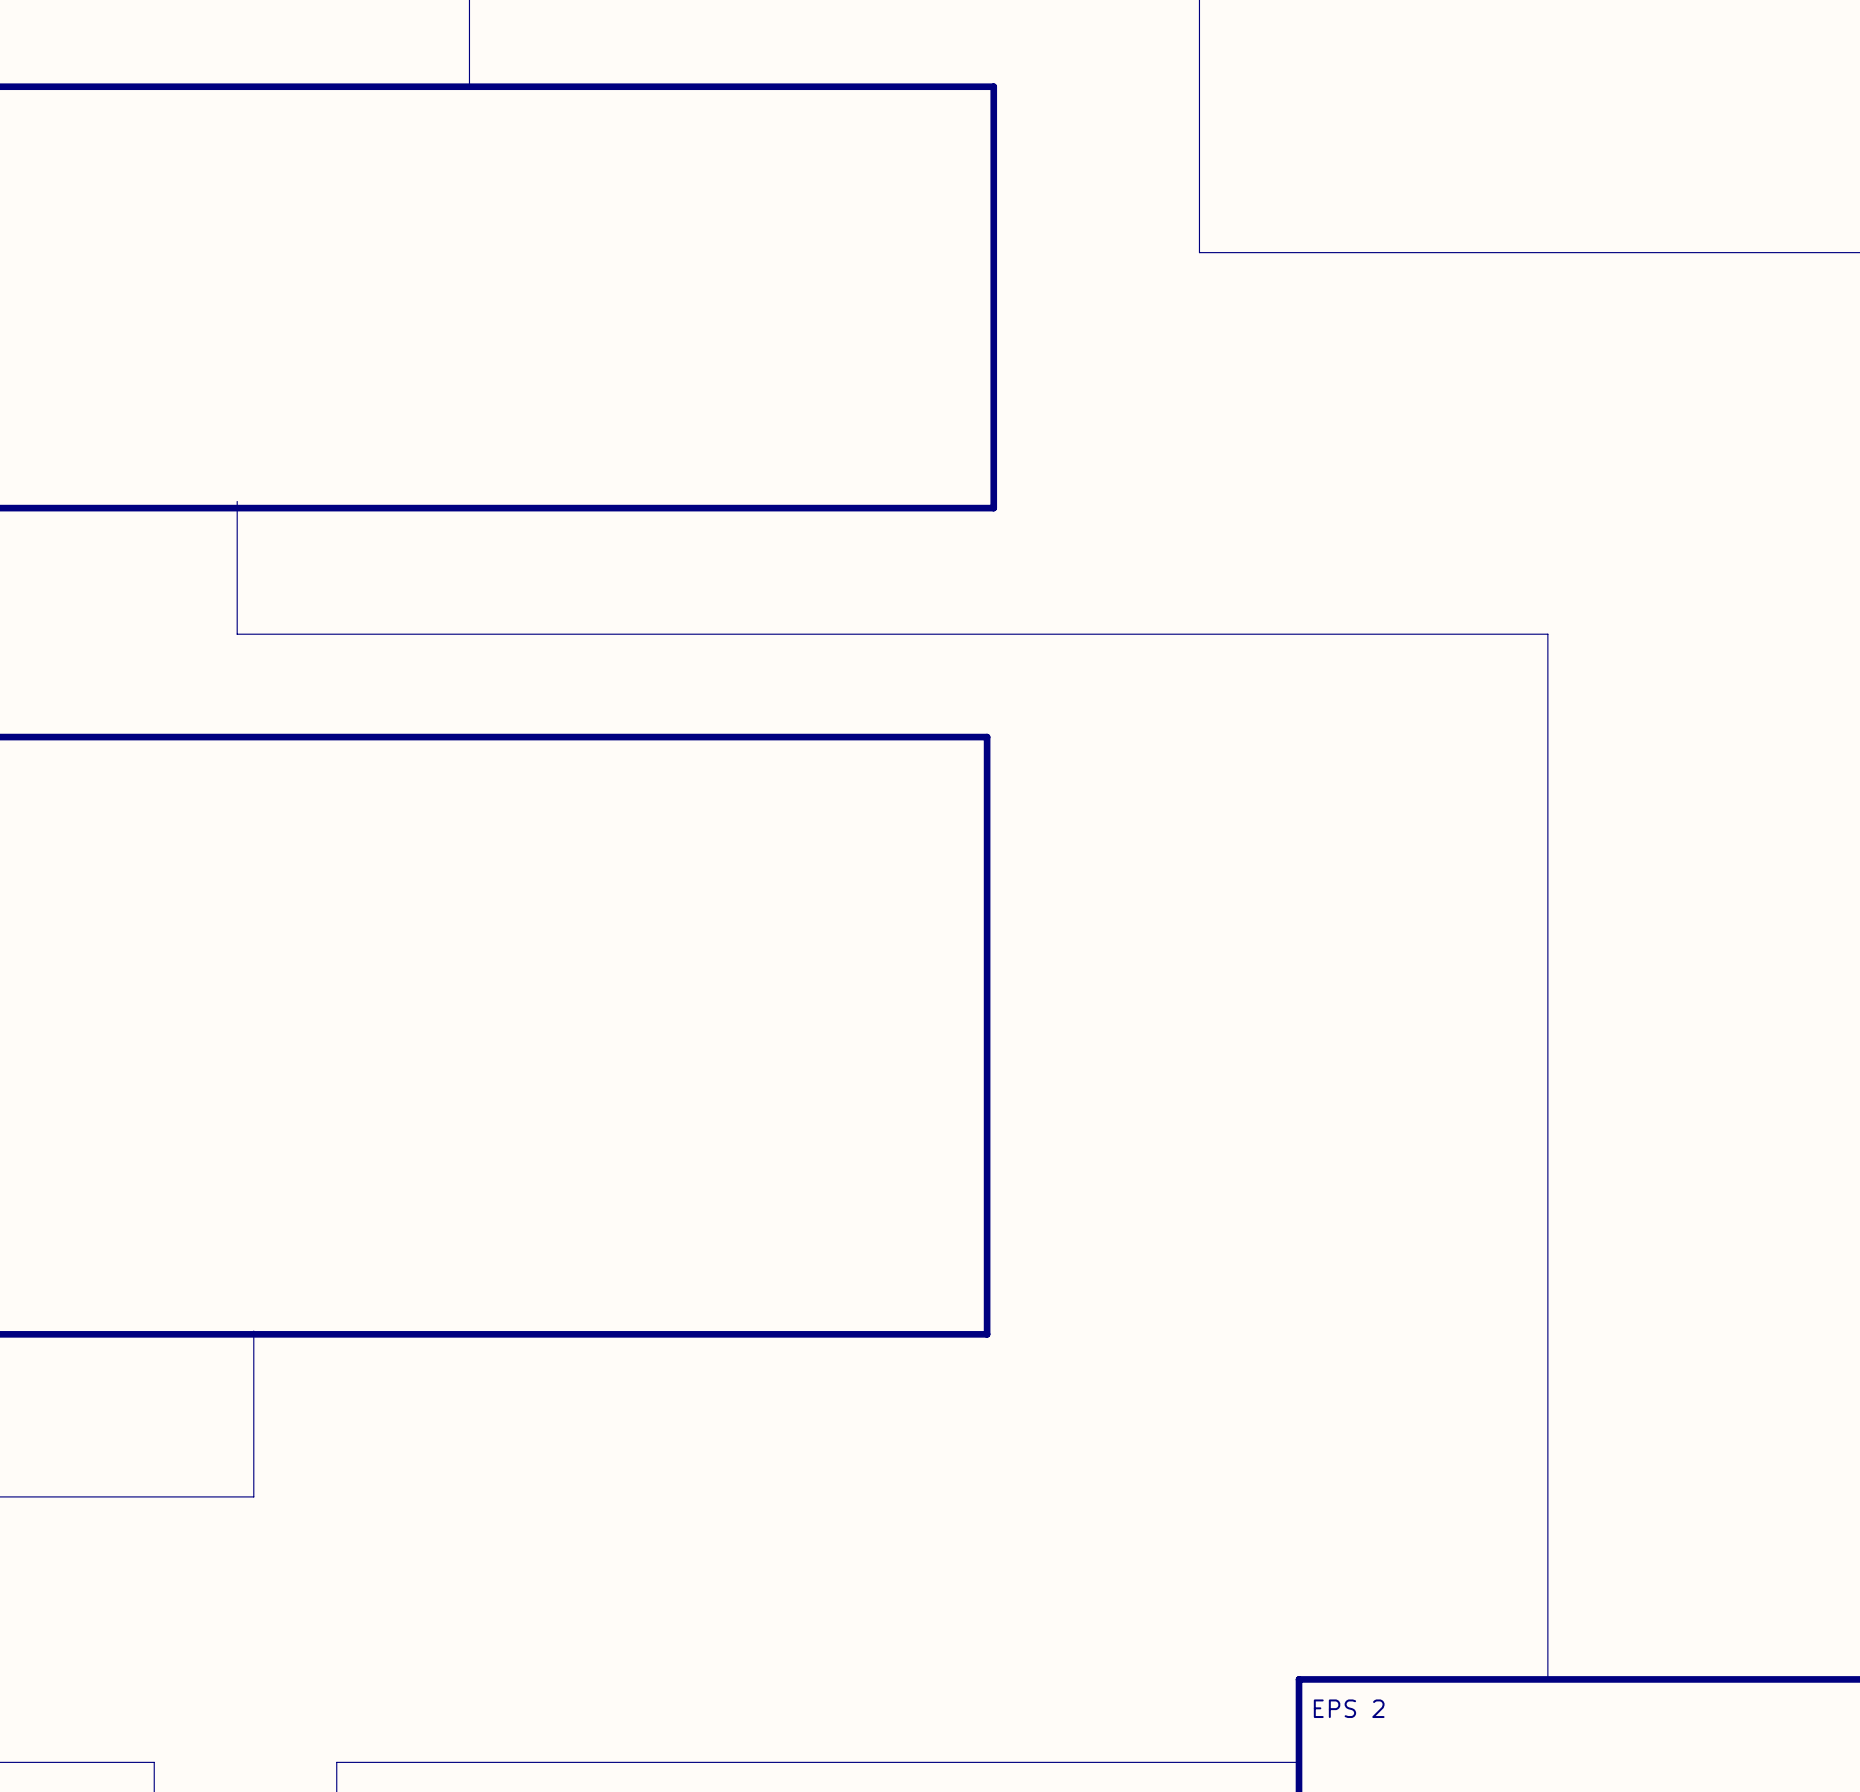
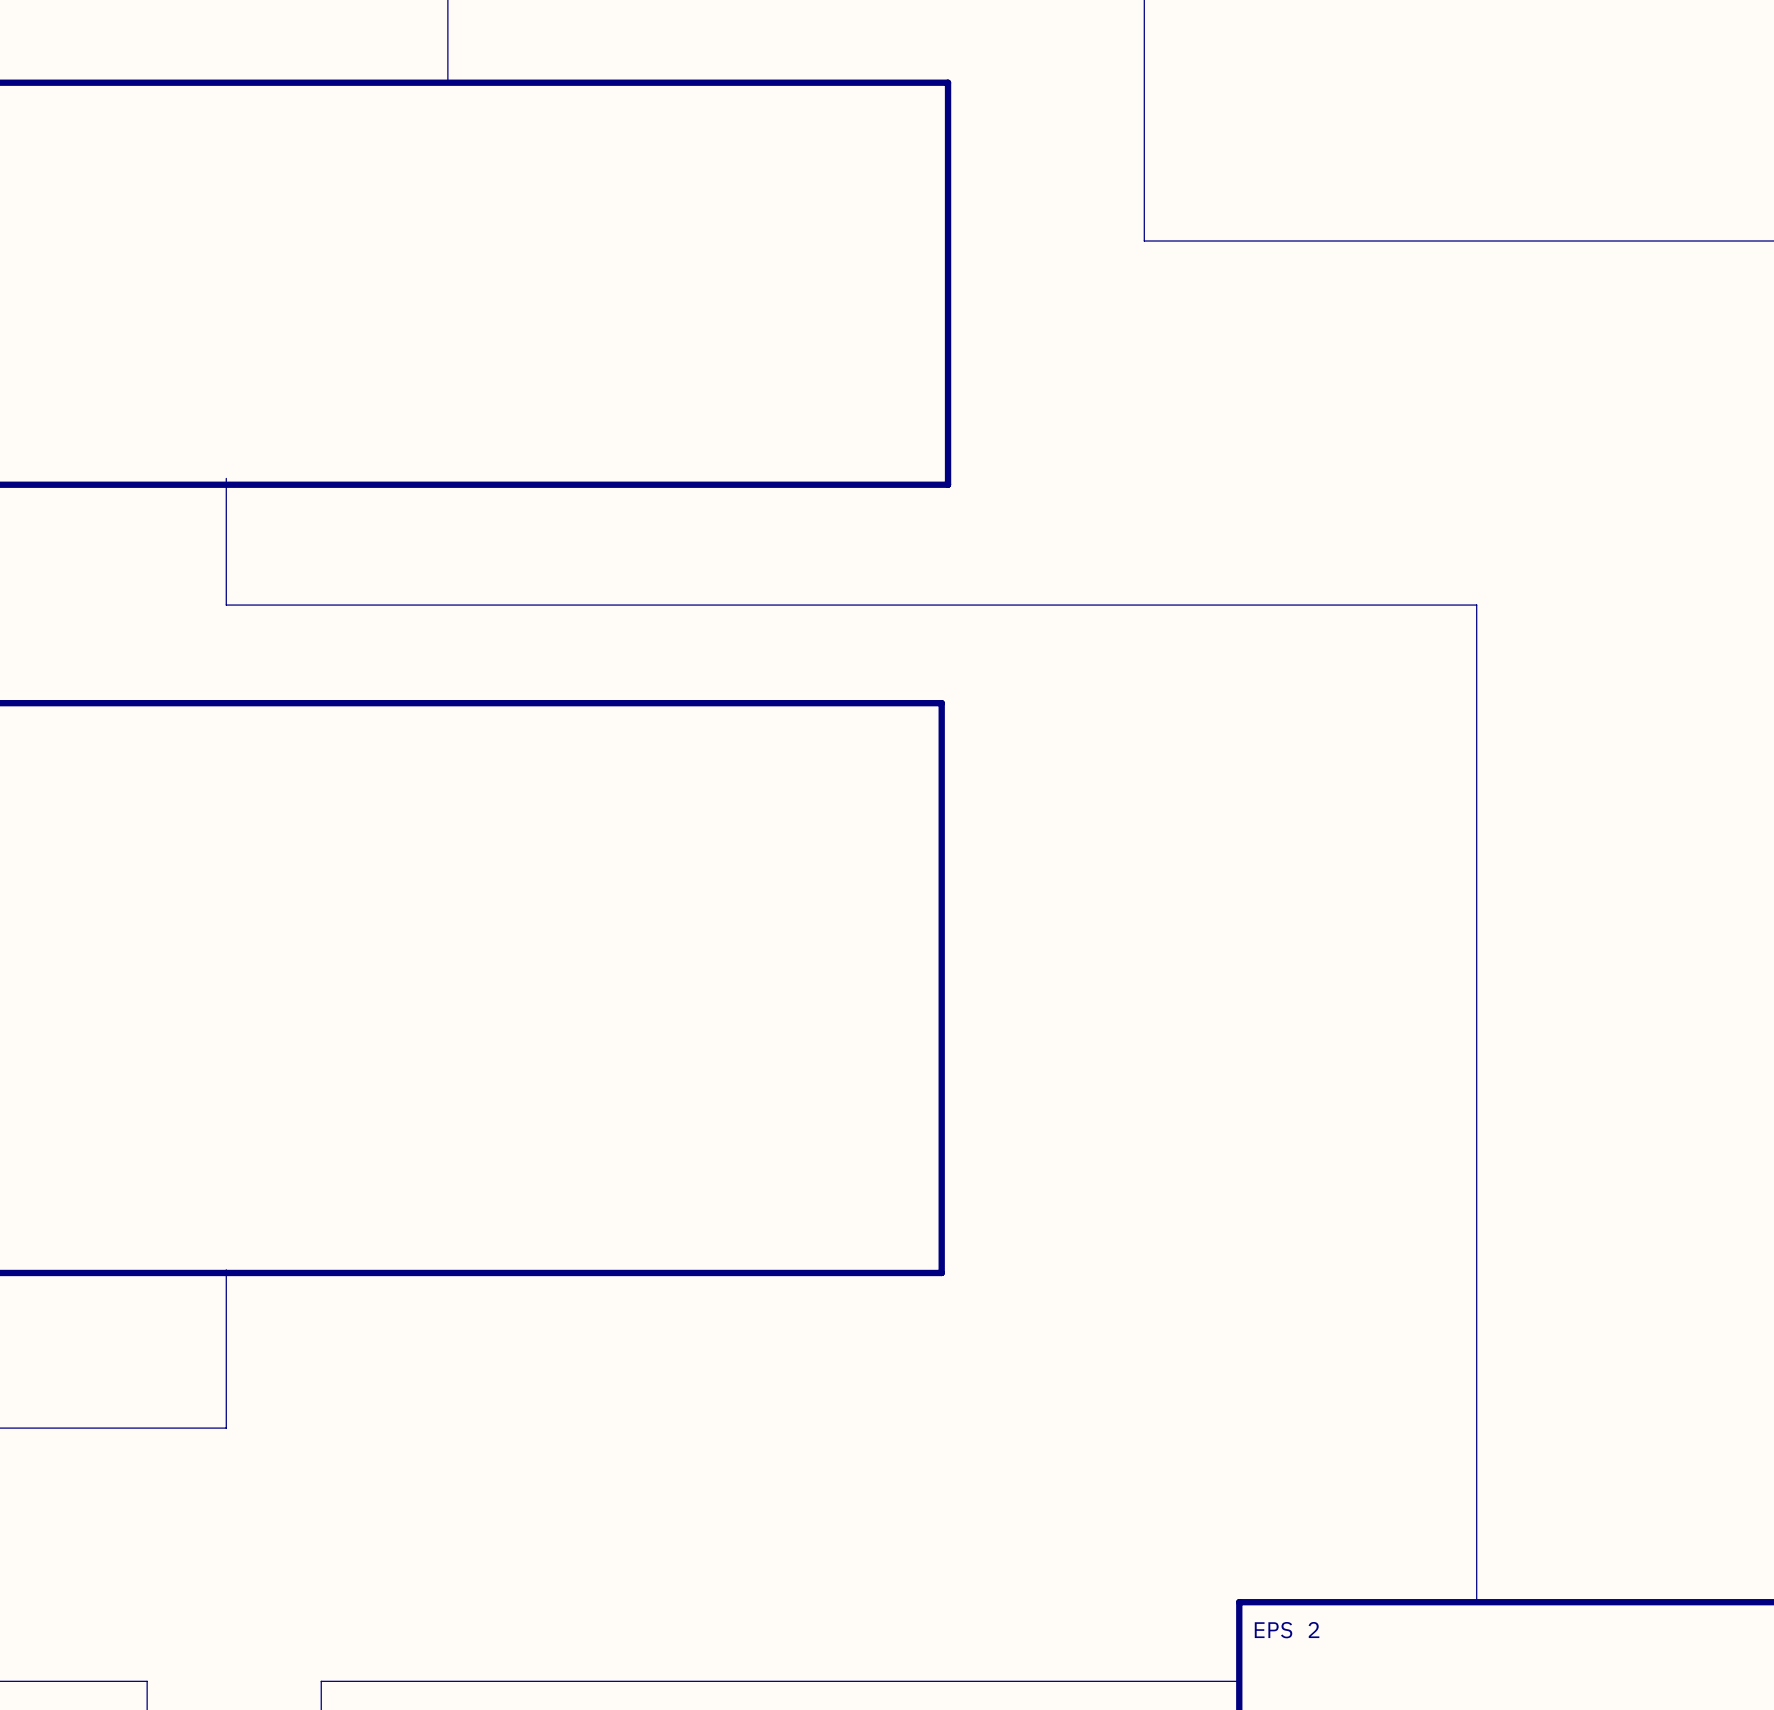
wire: (253, 1331) (253, 1496) (237, 1496) -> (226, 1269) (226, 1428)

